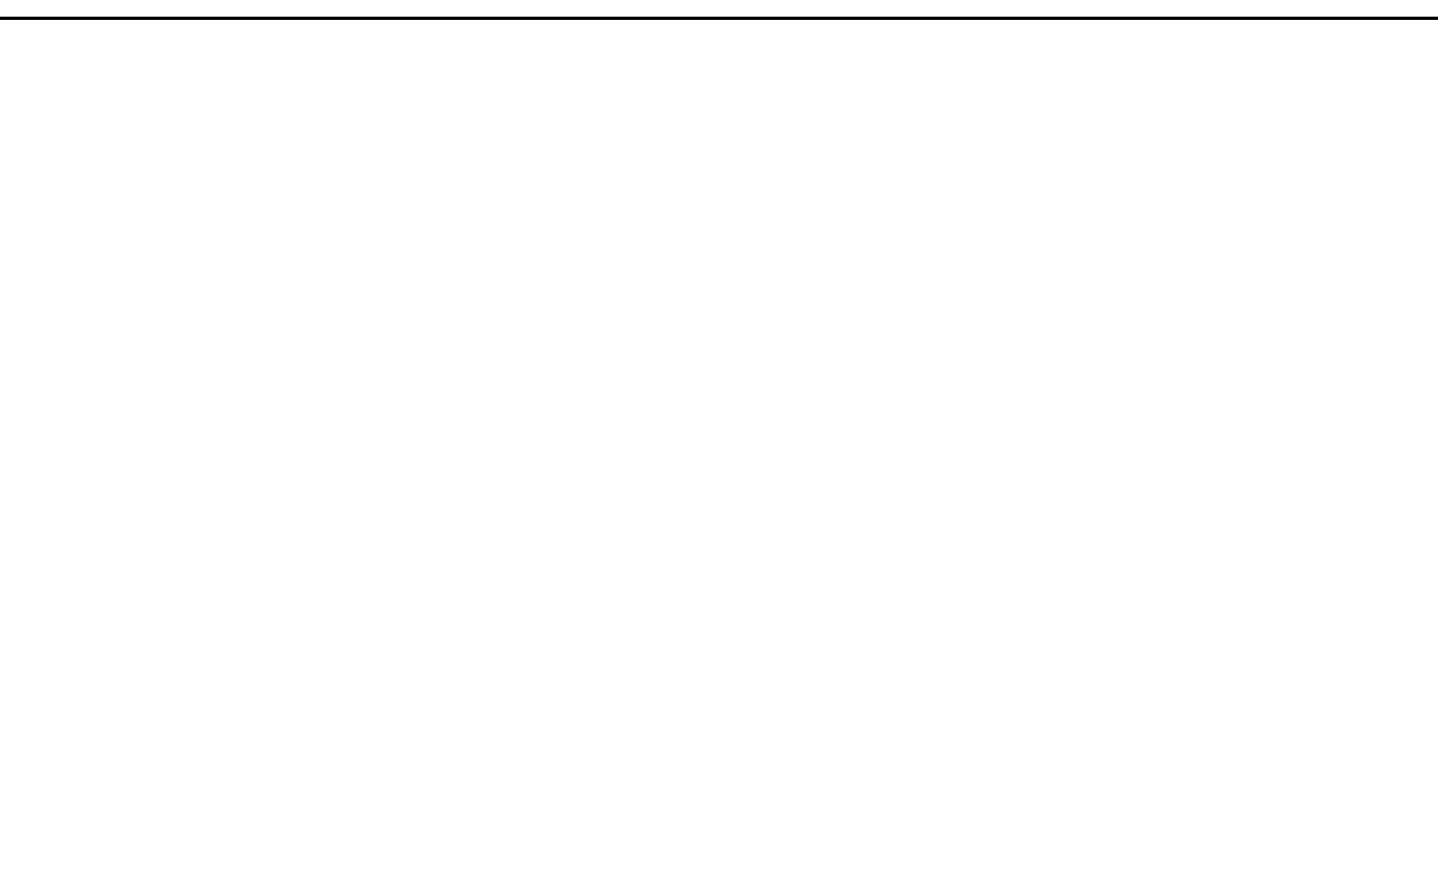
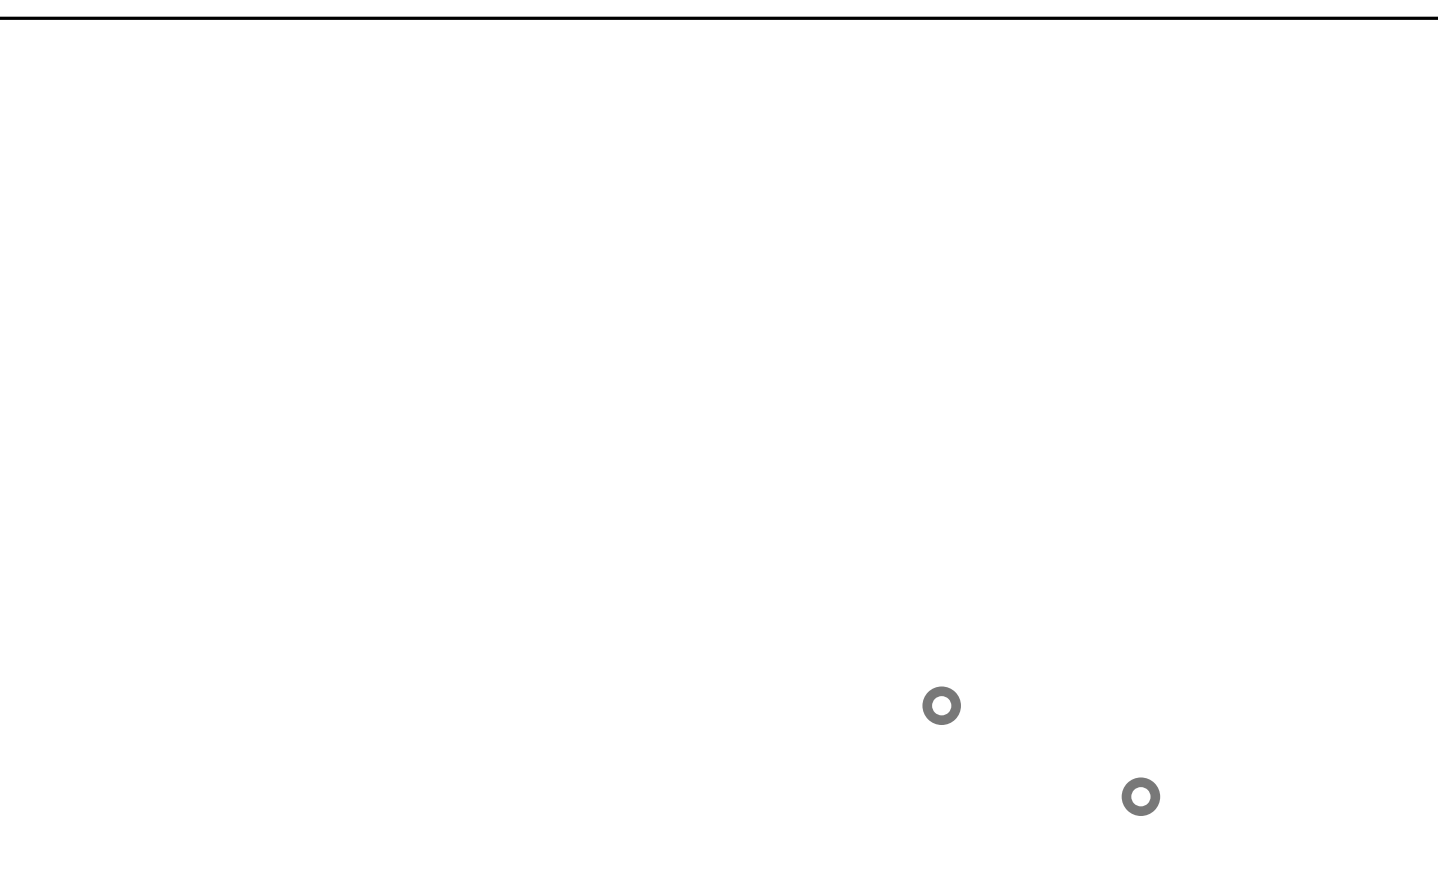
via: none -> (941, 705)
via: none -> (1140, 796)

